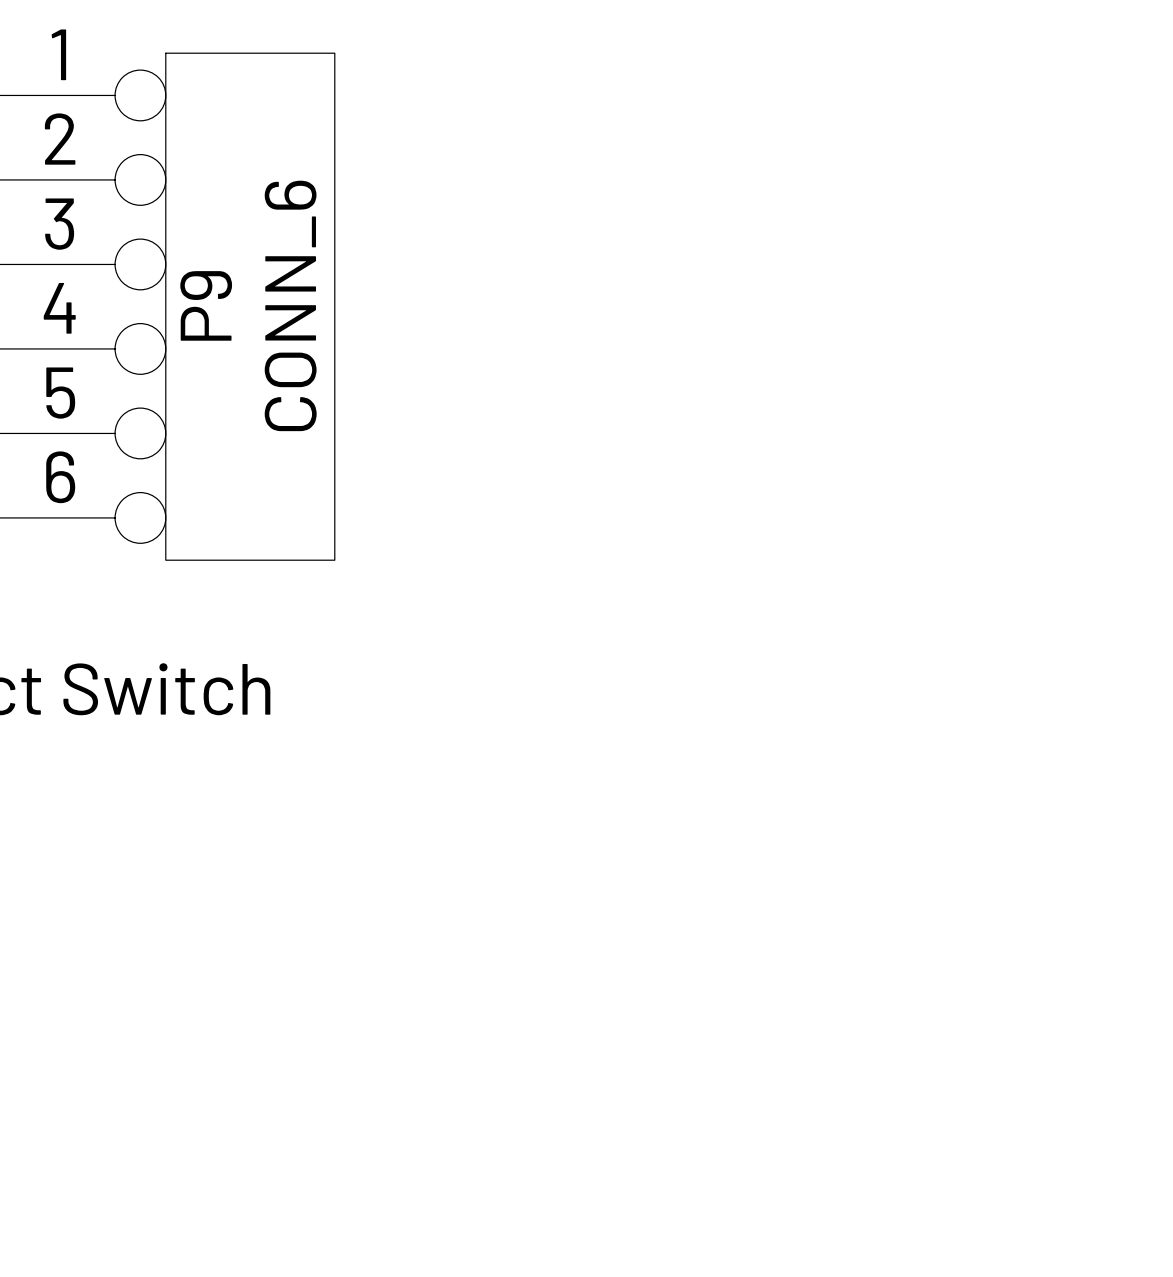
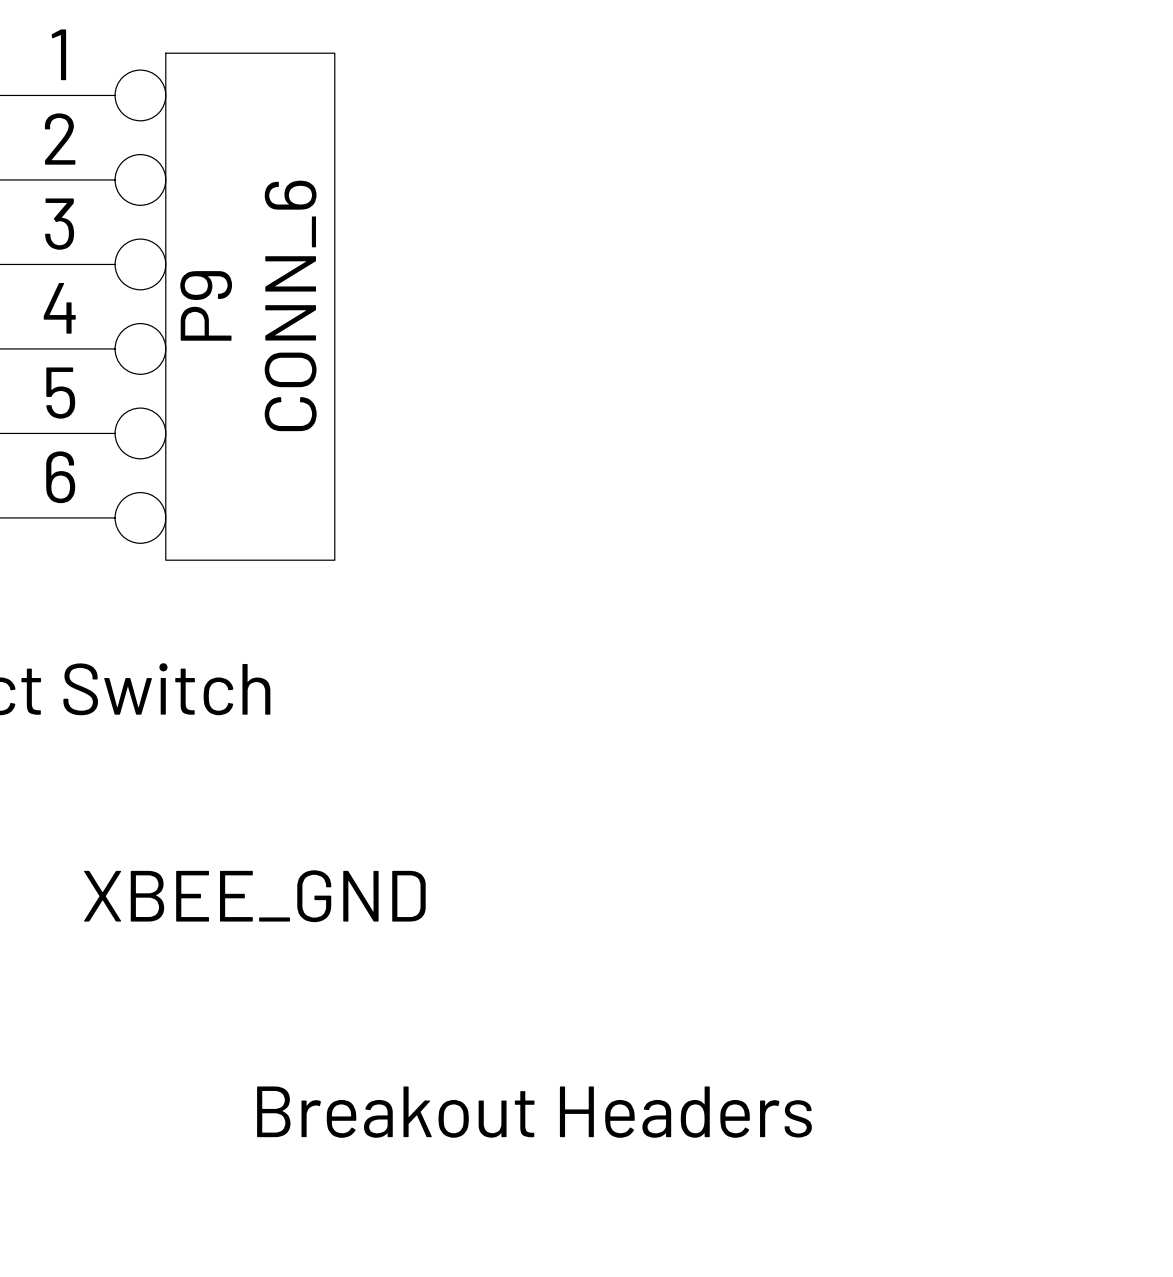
label: none -> XBEE_GND (254, 896)
text: none -> Breakout Headers (534, 1112)

